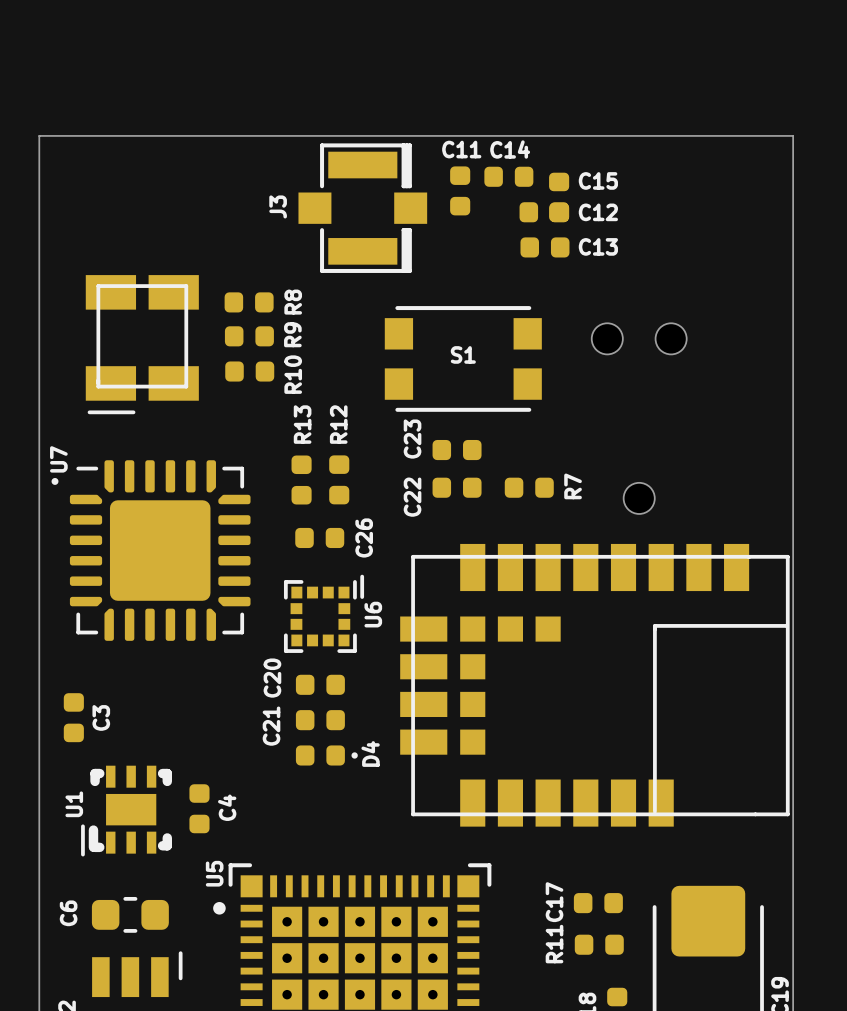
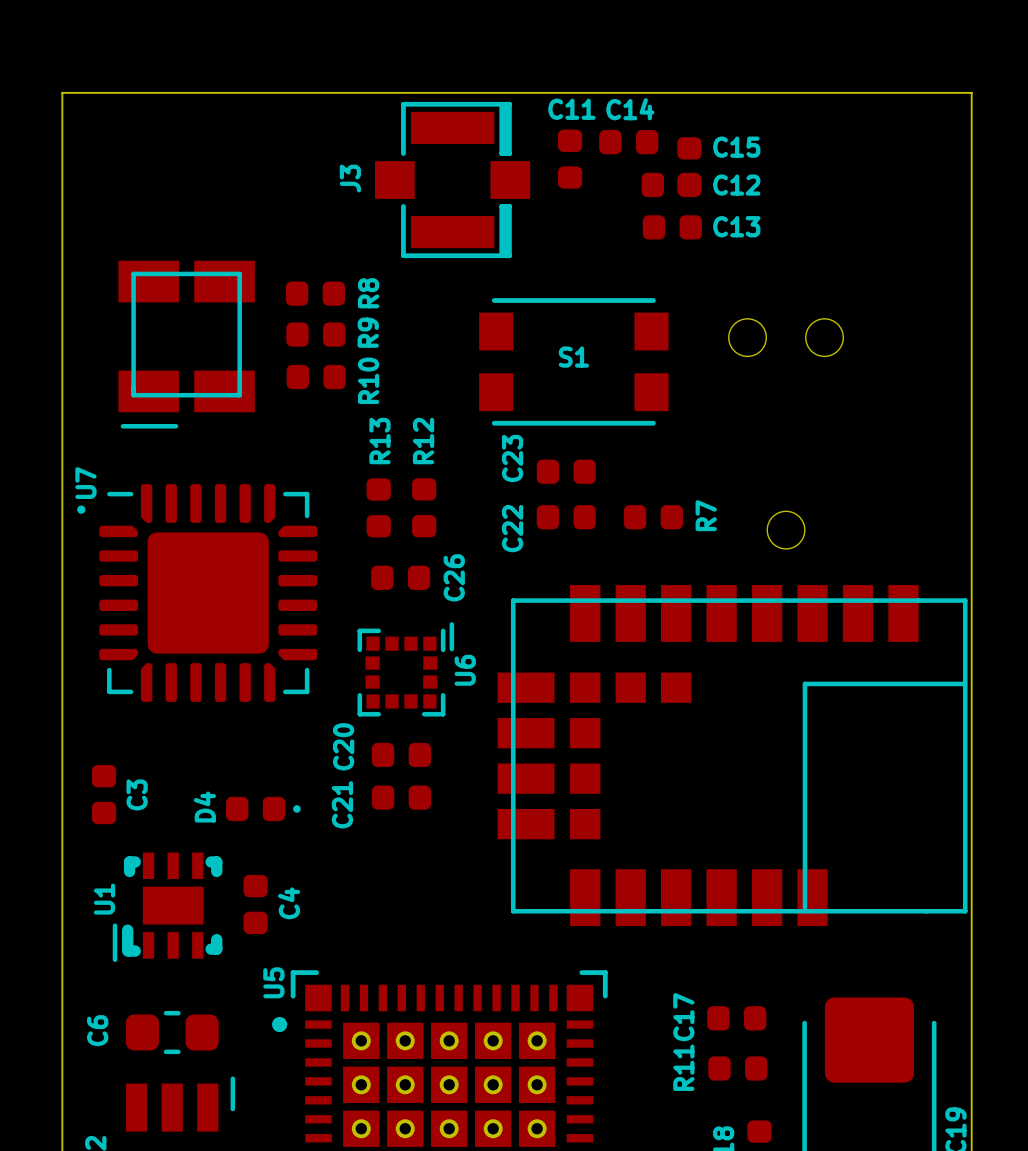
D4 name position: D4 (370, 754) -> D4 (204, 807)
D4 position: (326, 755) -> (263, 808)

